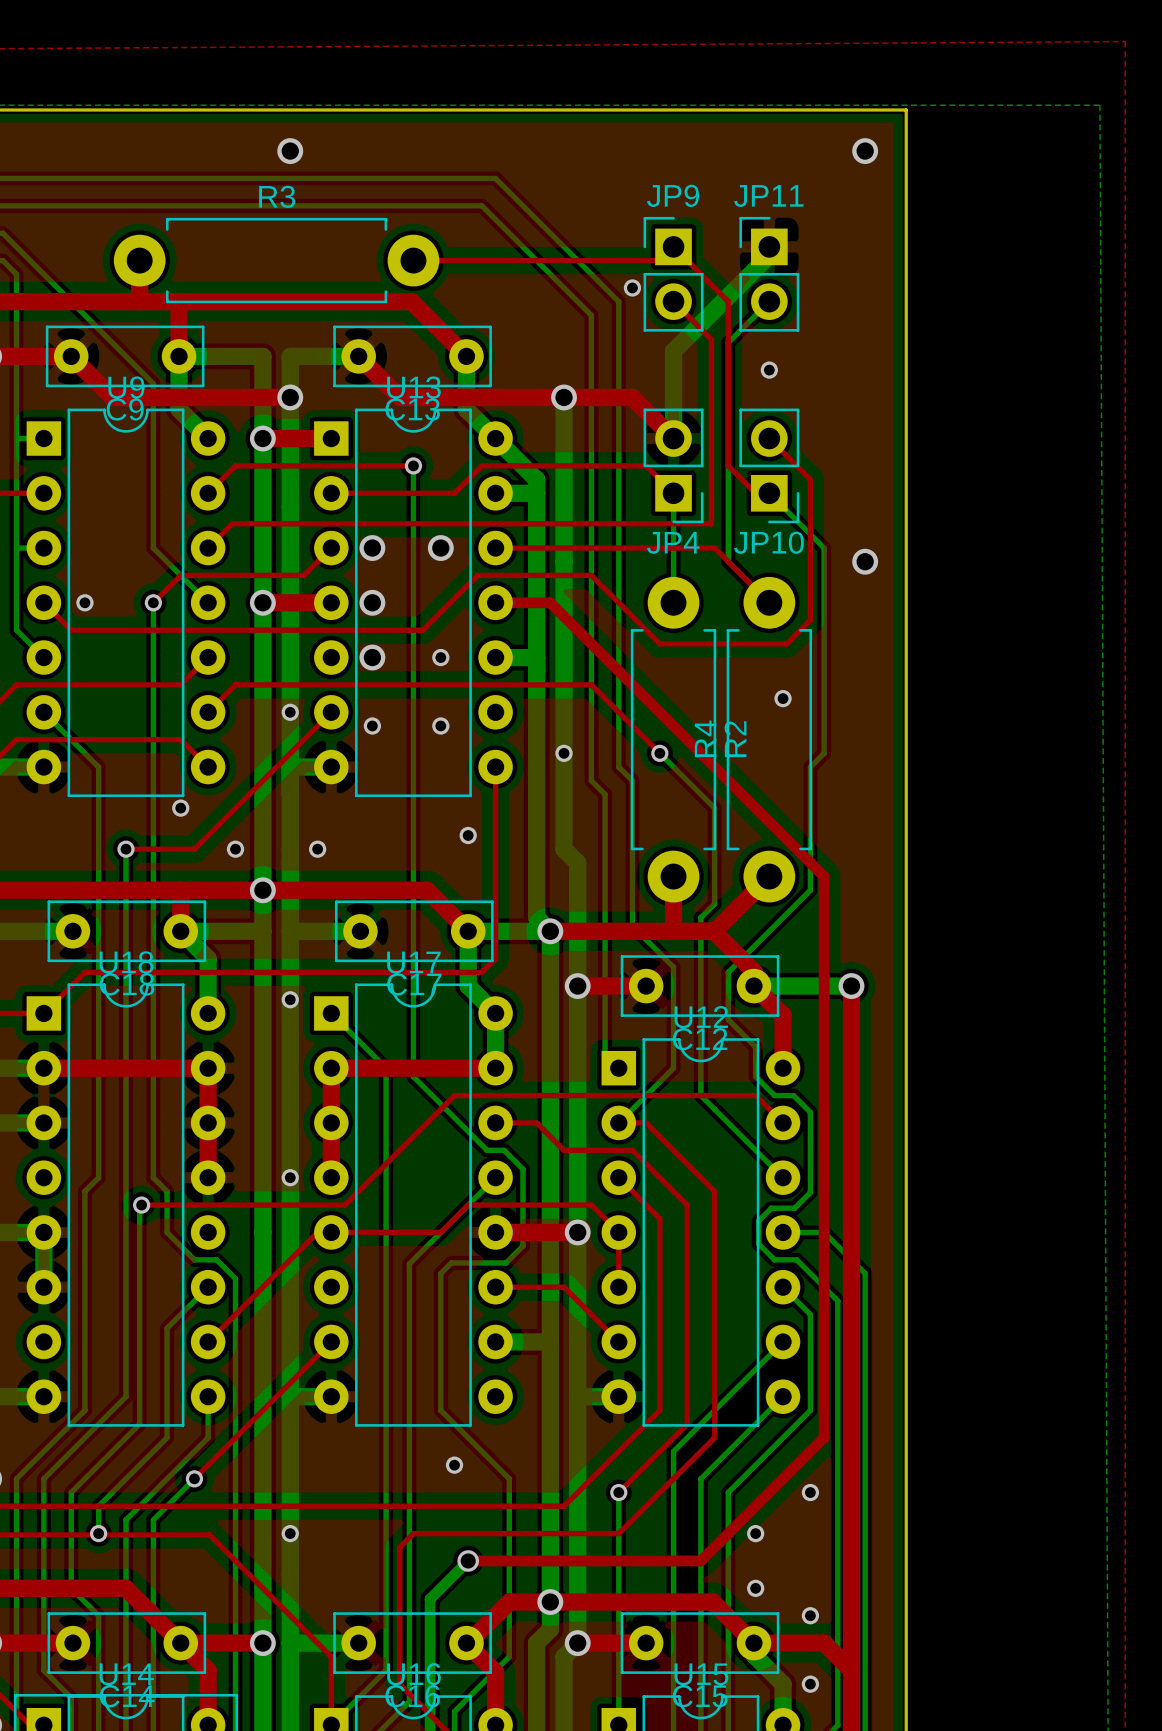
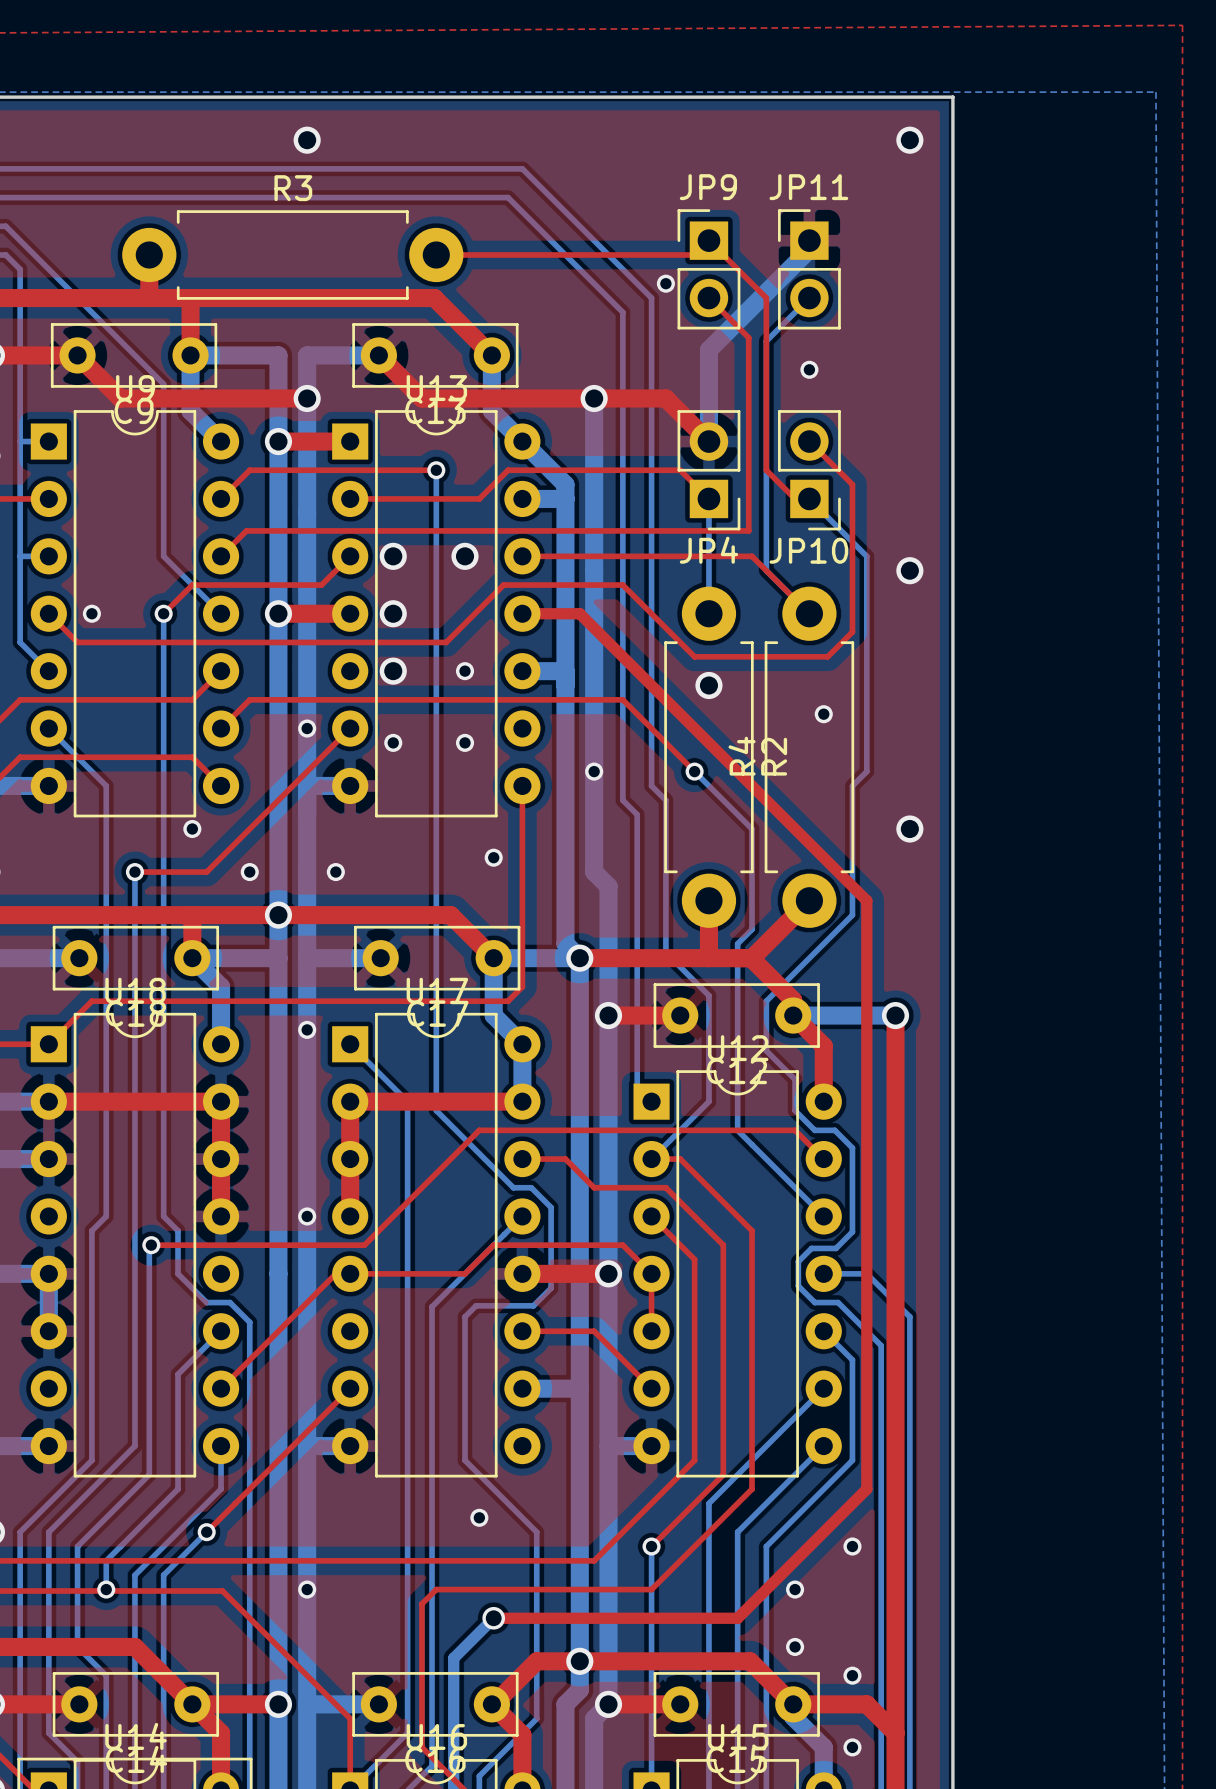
via: none -> (708, 685)
via: none -> (909, 829)

